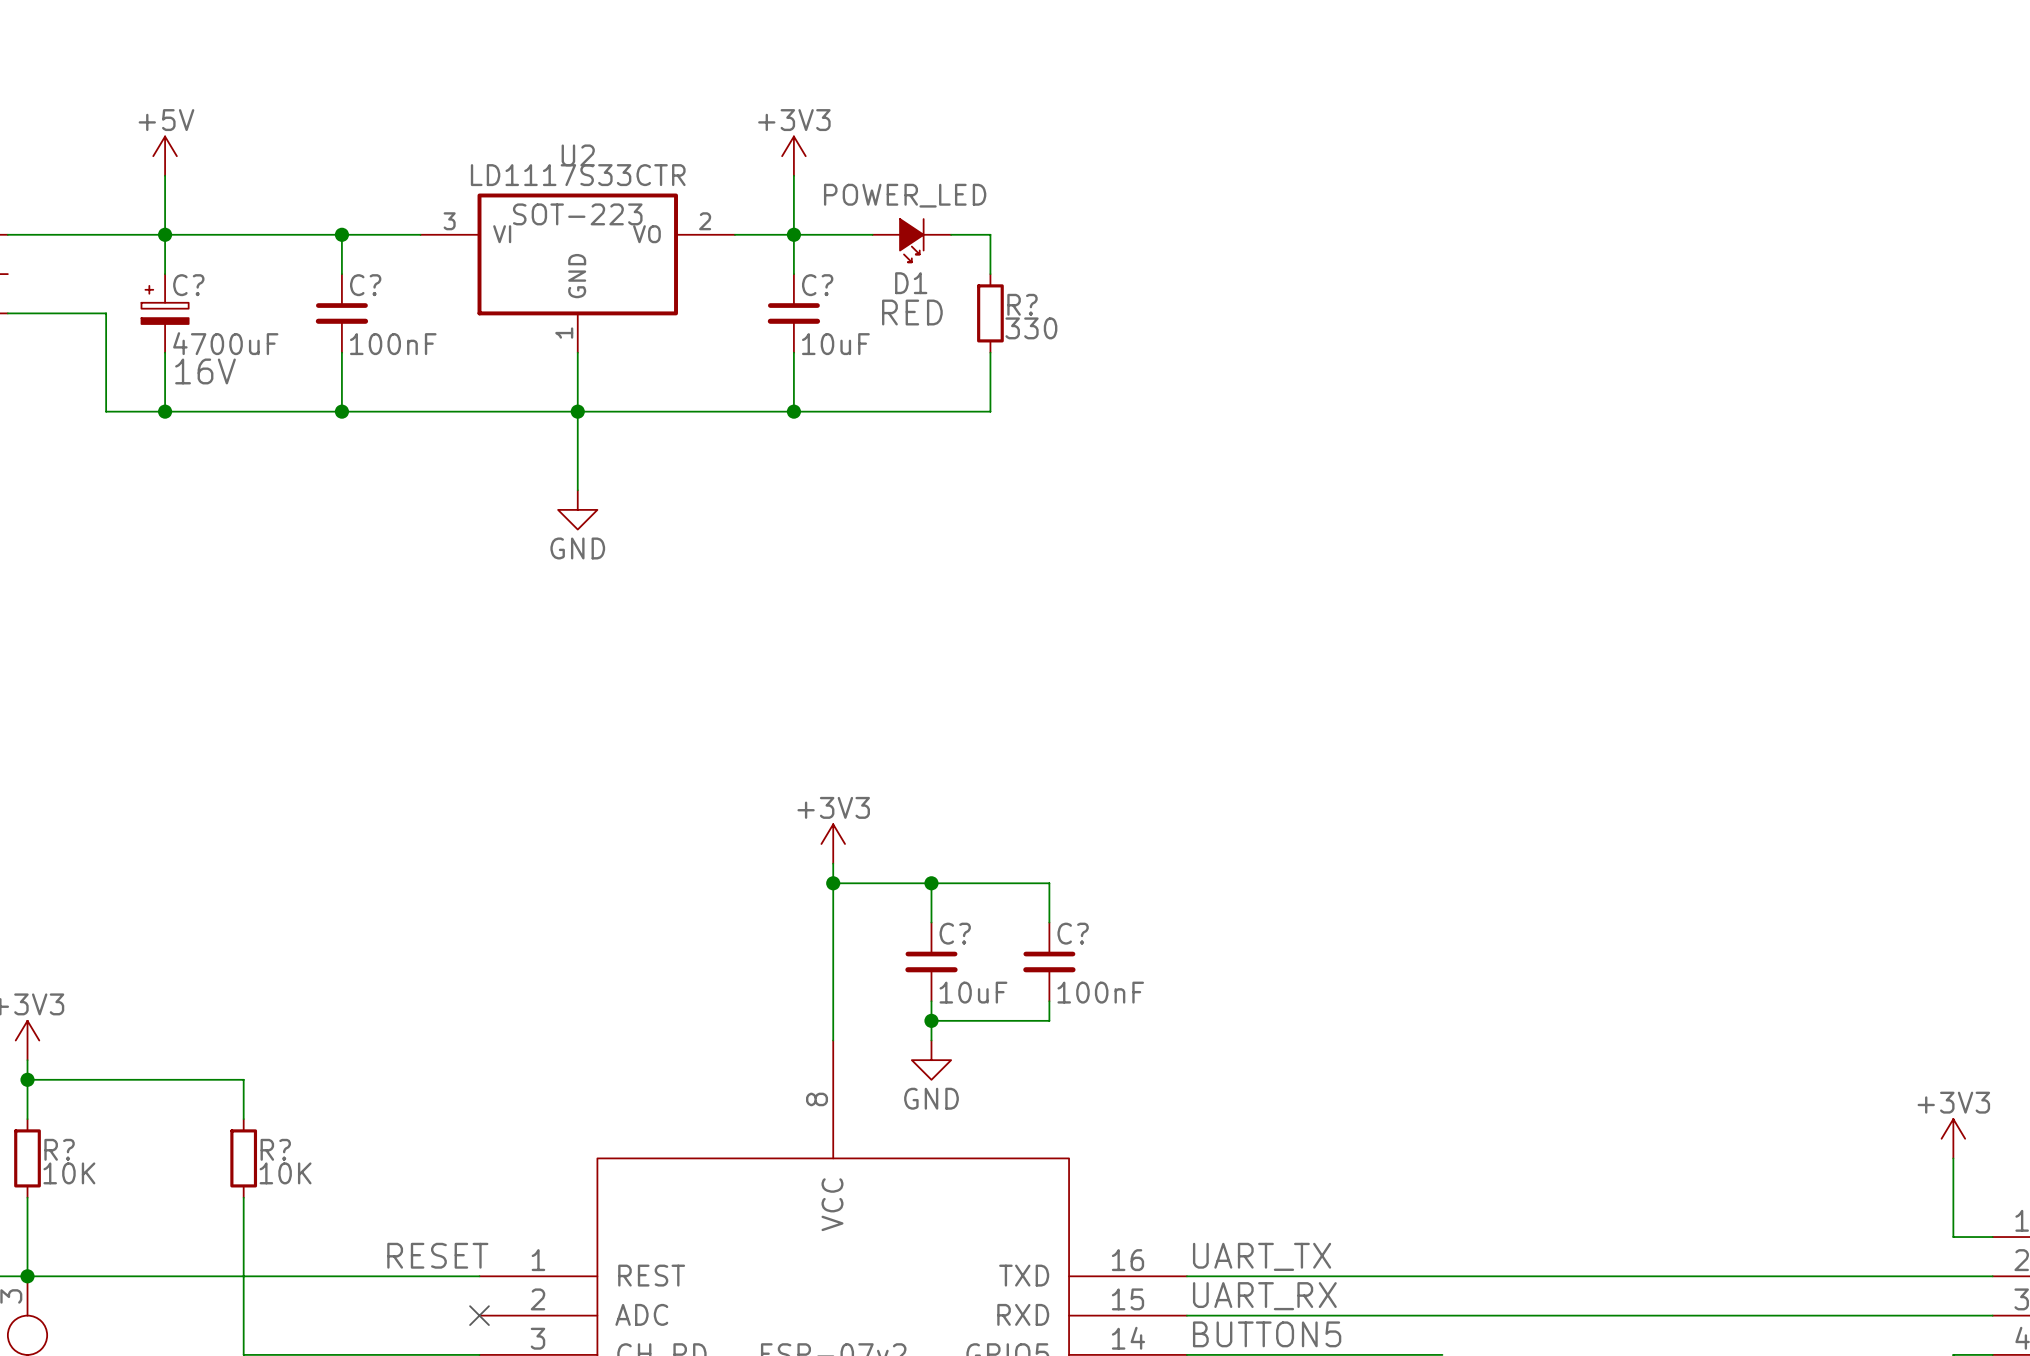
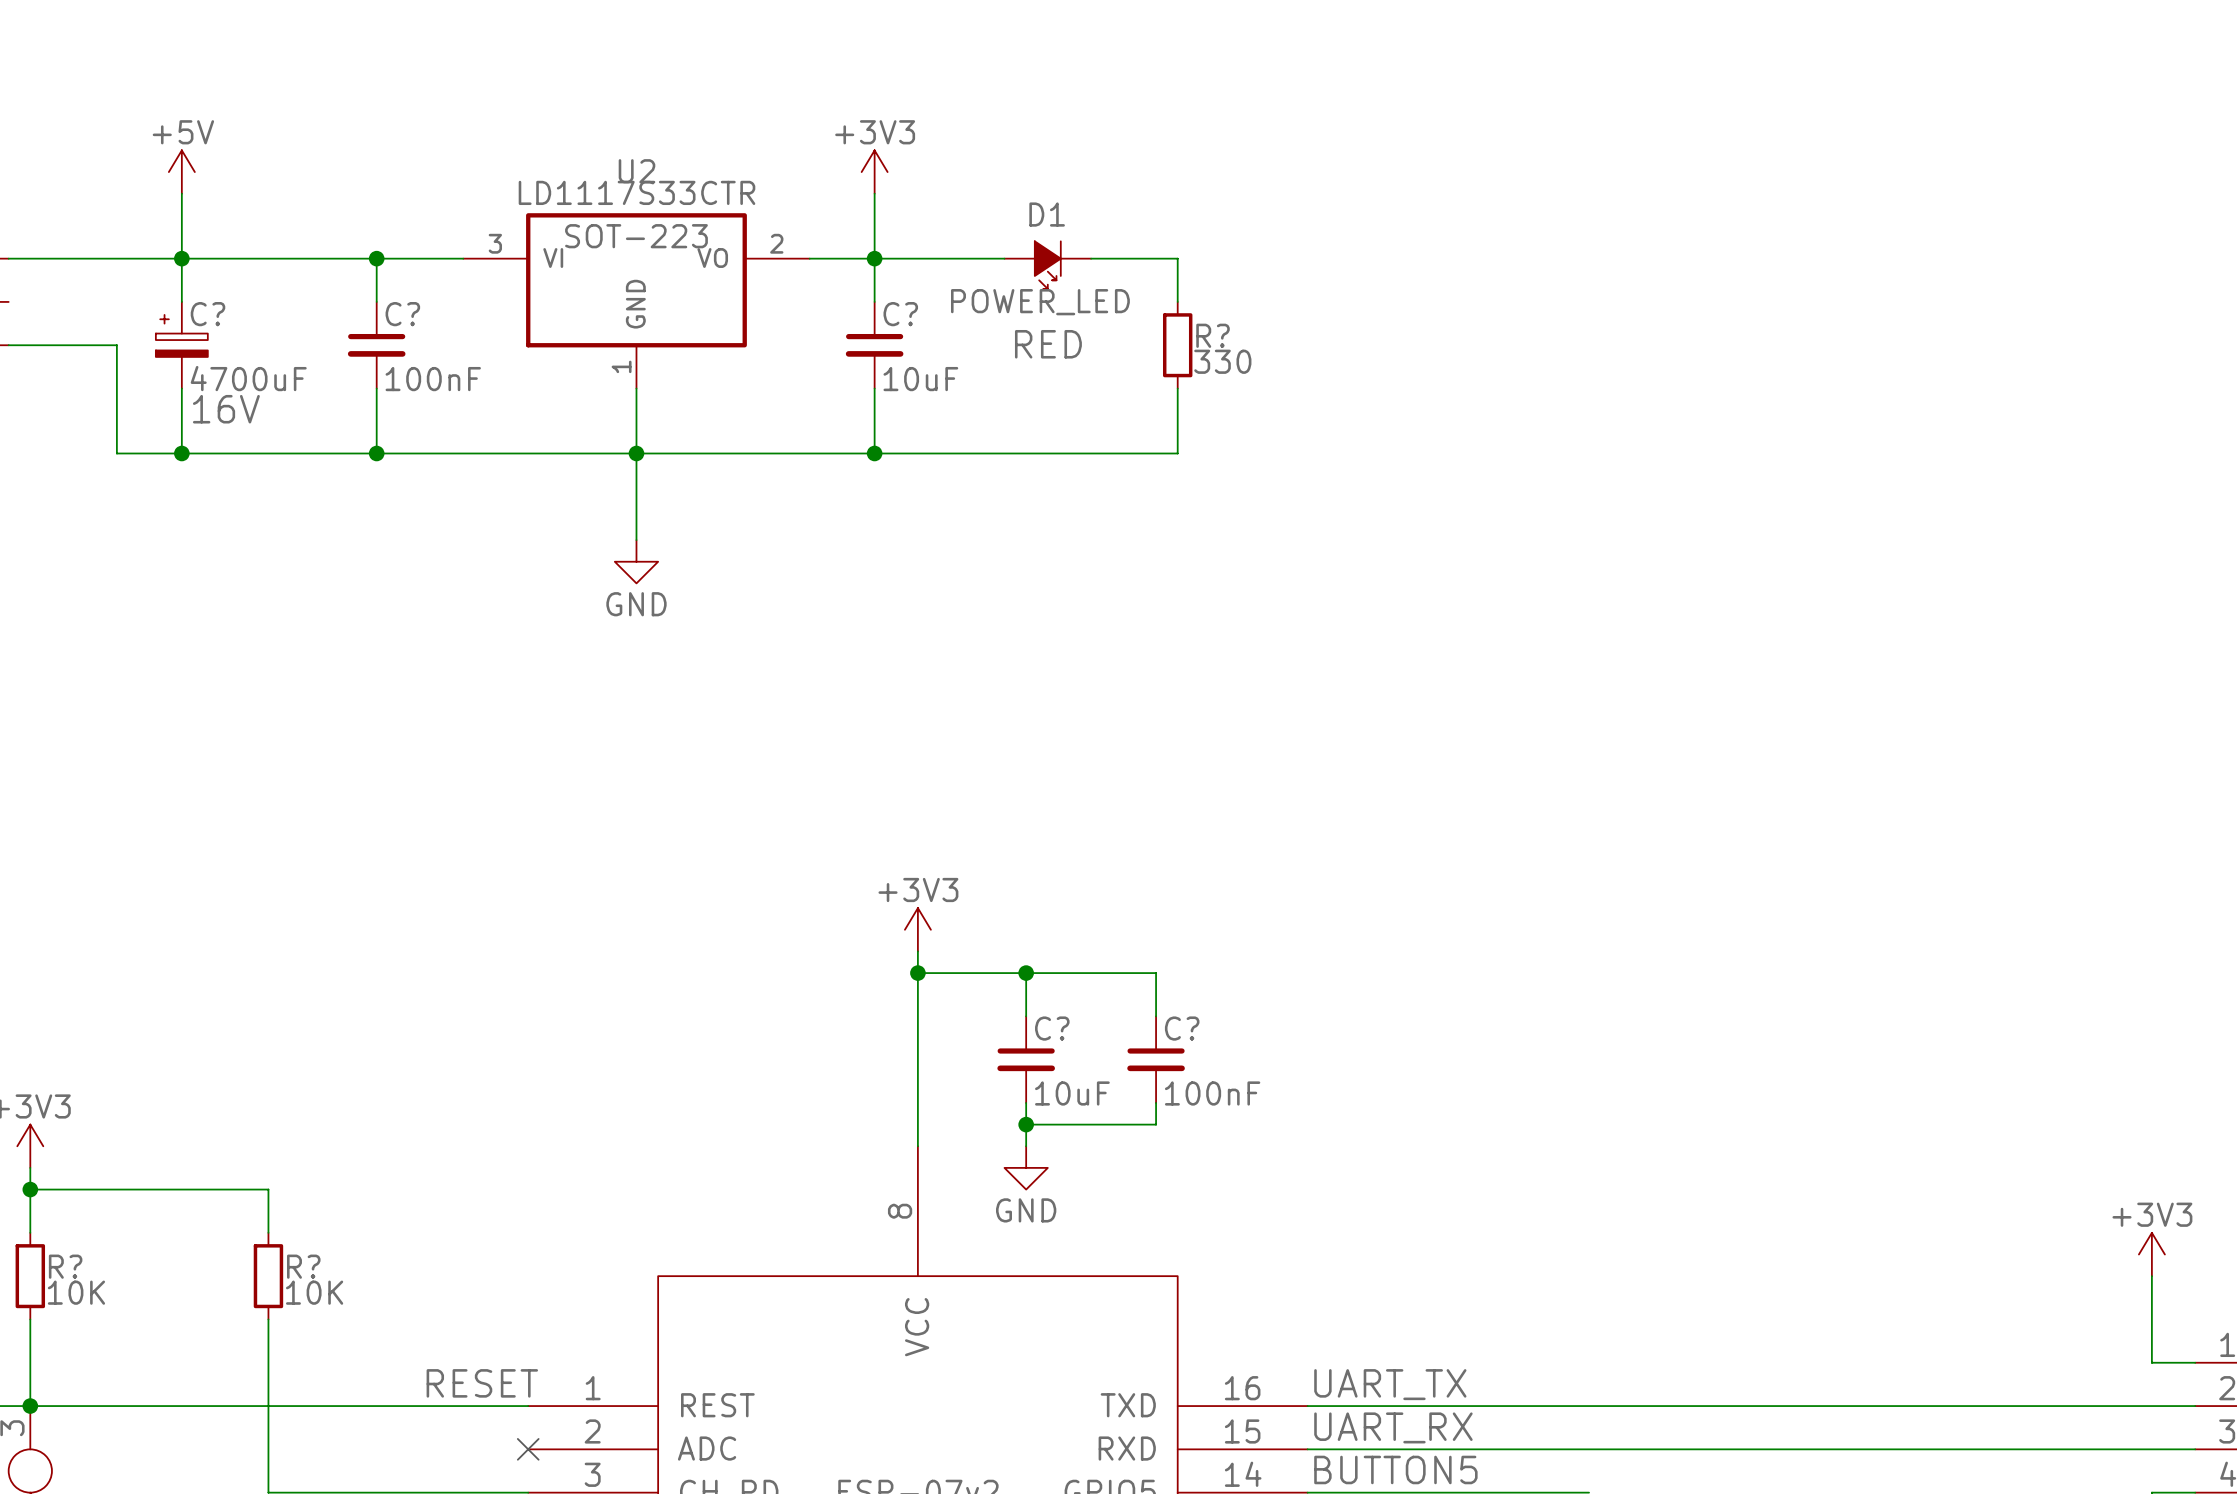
D1 value position: POWER_LED (905, 195) -> POWER_LED (1040, 302)
wire: (951, 234) (990, 234) (990, 274) -> none
wire: none -> (1091, 258) (1177, 258) (1177, 301)
D1 position: (911, 240) -> (1047, 265)
D1 name position: D1 (911, 283) -> D1 (1047, 214)
R? position: (990, 313) -> (1177, 345)
wire: (990, 352) (990, 411) -> (1177, 388) (1177, 453) (1091, 453)

